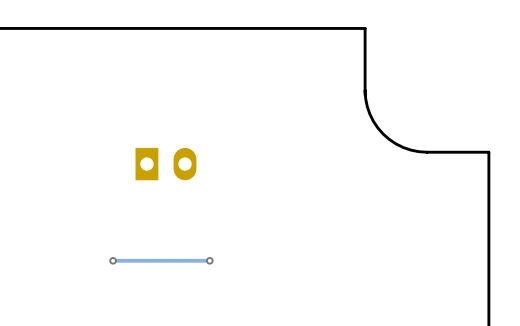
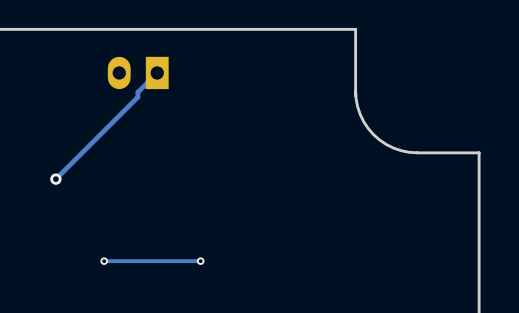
track: none -> (157, 72) (137, 92) (137, 97) (55, 179)
part rotation: 0° (165, 164) -> 180° (138, 72)
part position: (165, 164) -> (138, 72)
via: none -> (55, 179)

